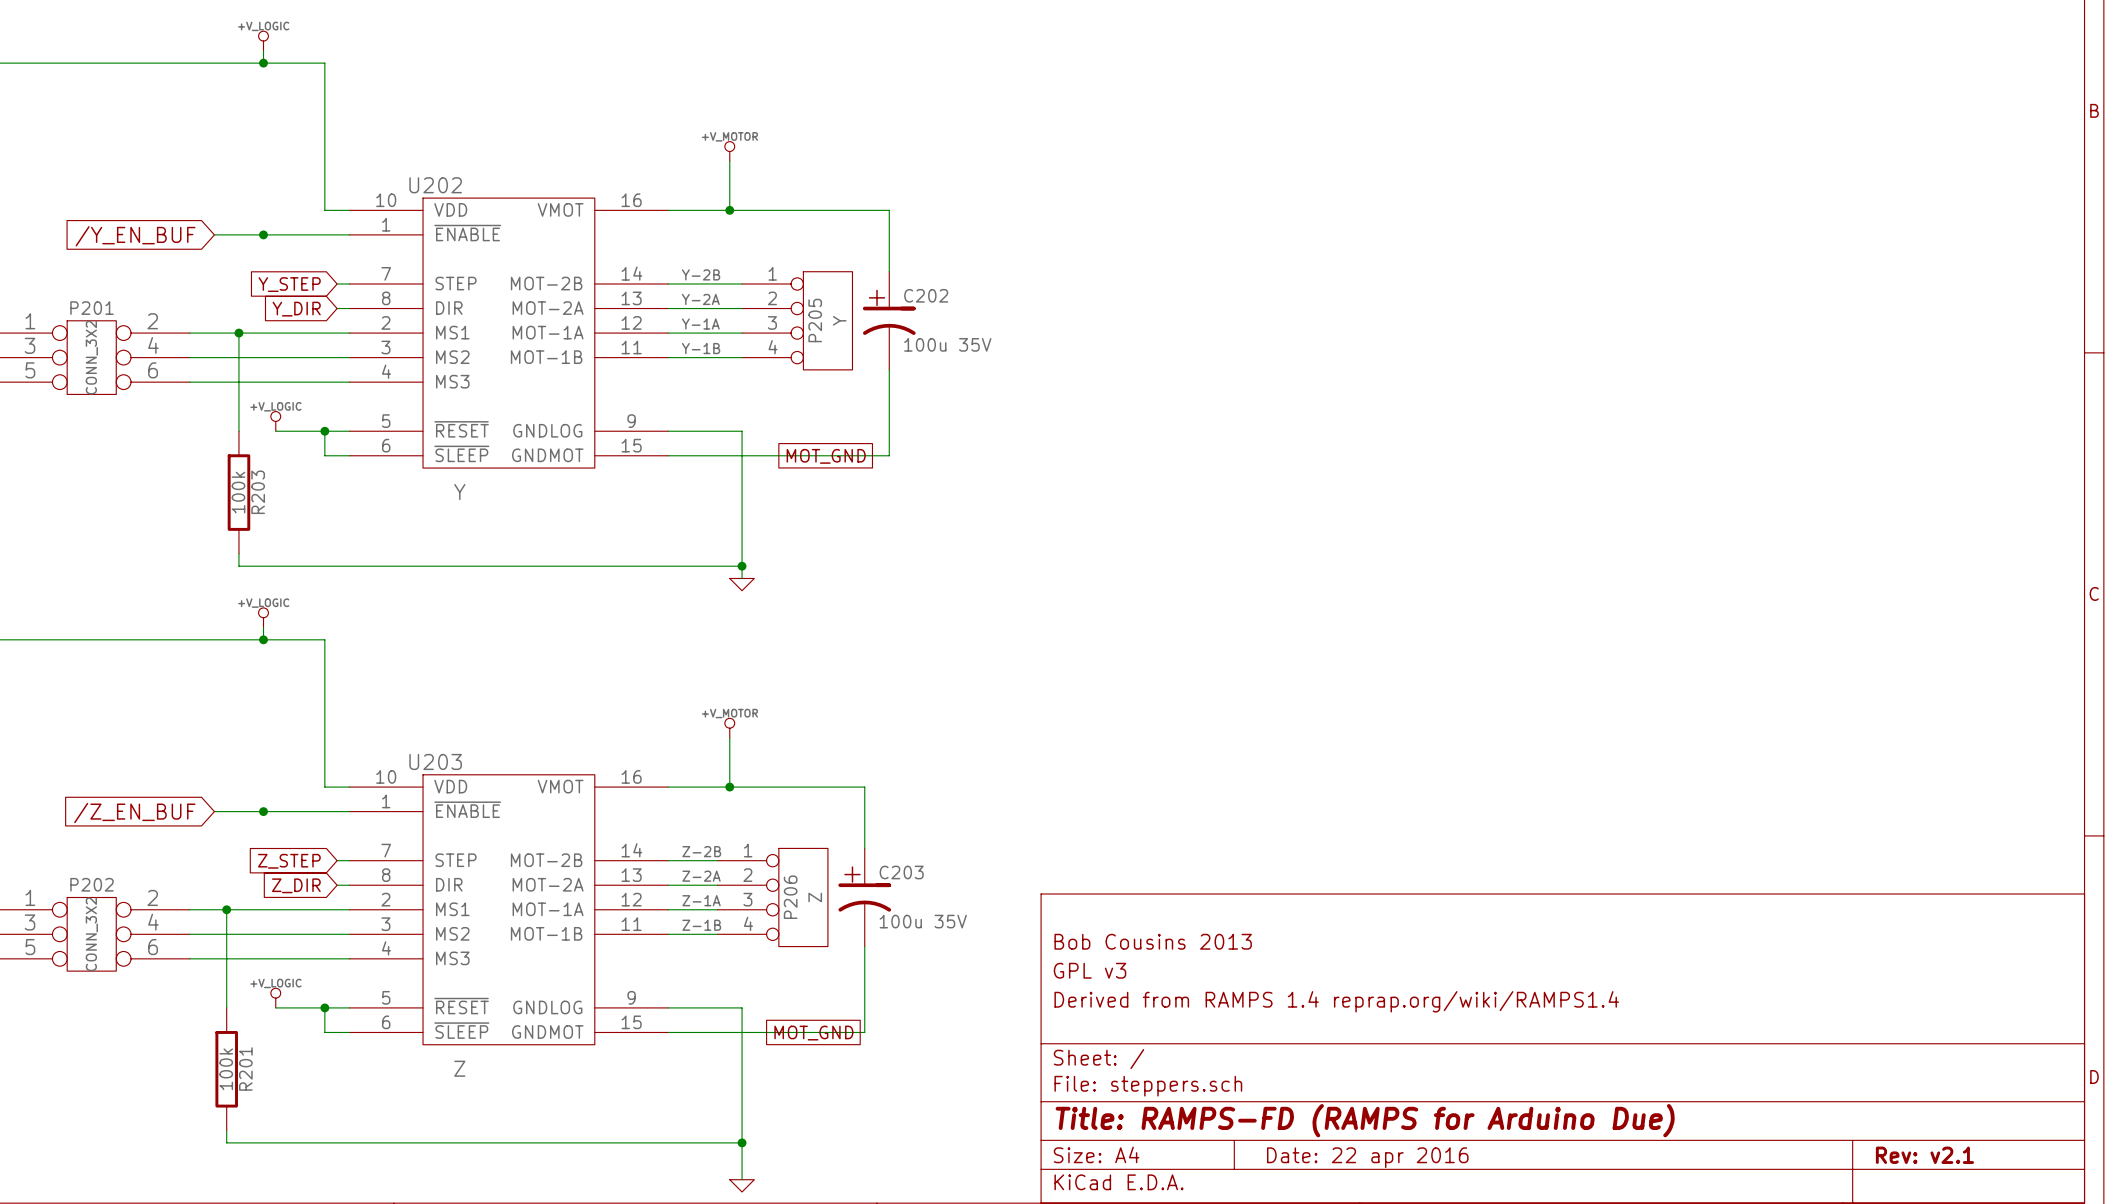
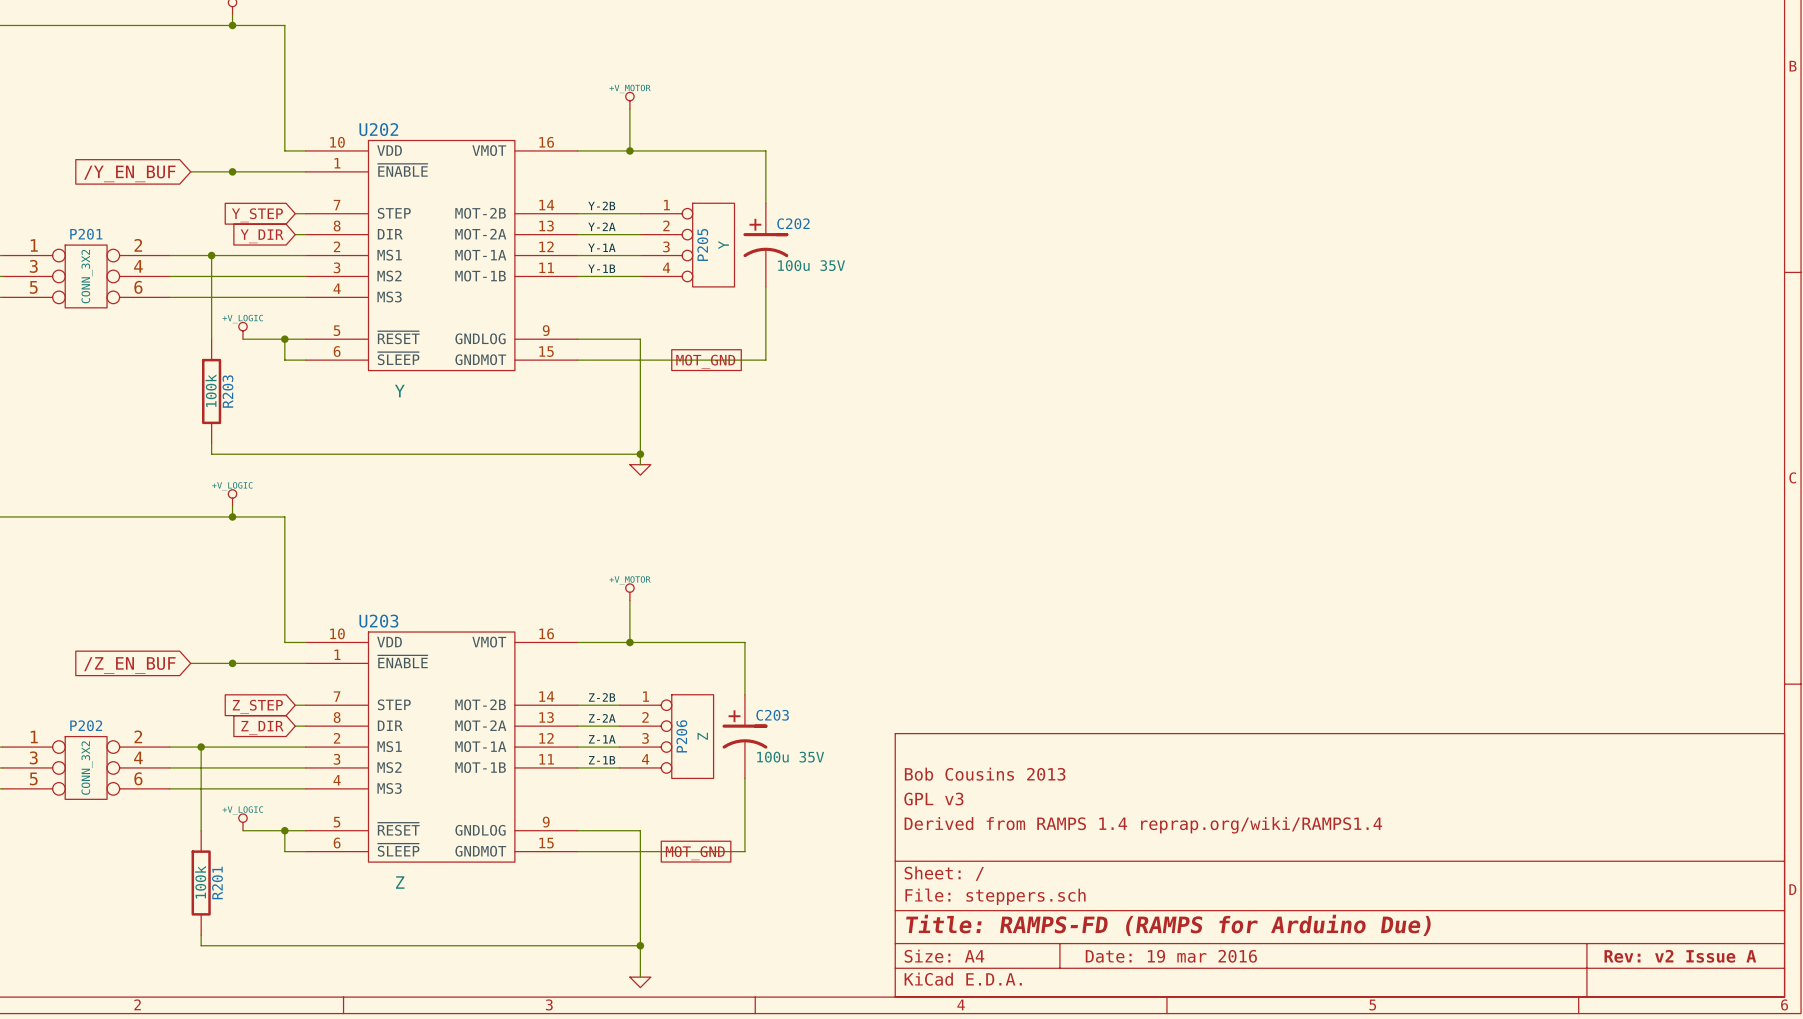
title block: Rev: v2.1 (1924, 1155) -> Rev: v2 Issue A (1680, 956)
title block: Date: 22 apr 2016 (1367, 1157) -> Date: 19 mar 2016 (1171, 956)

